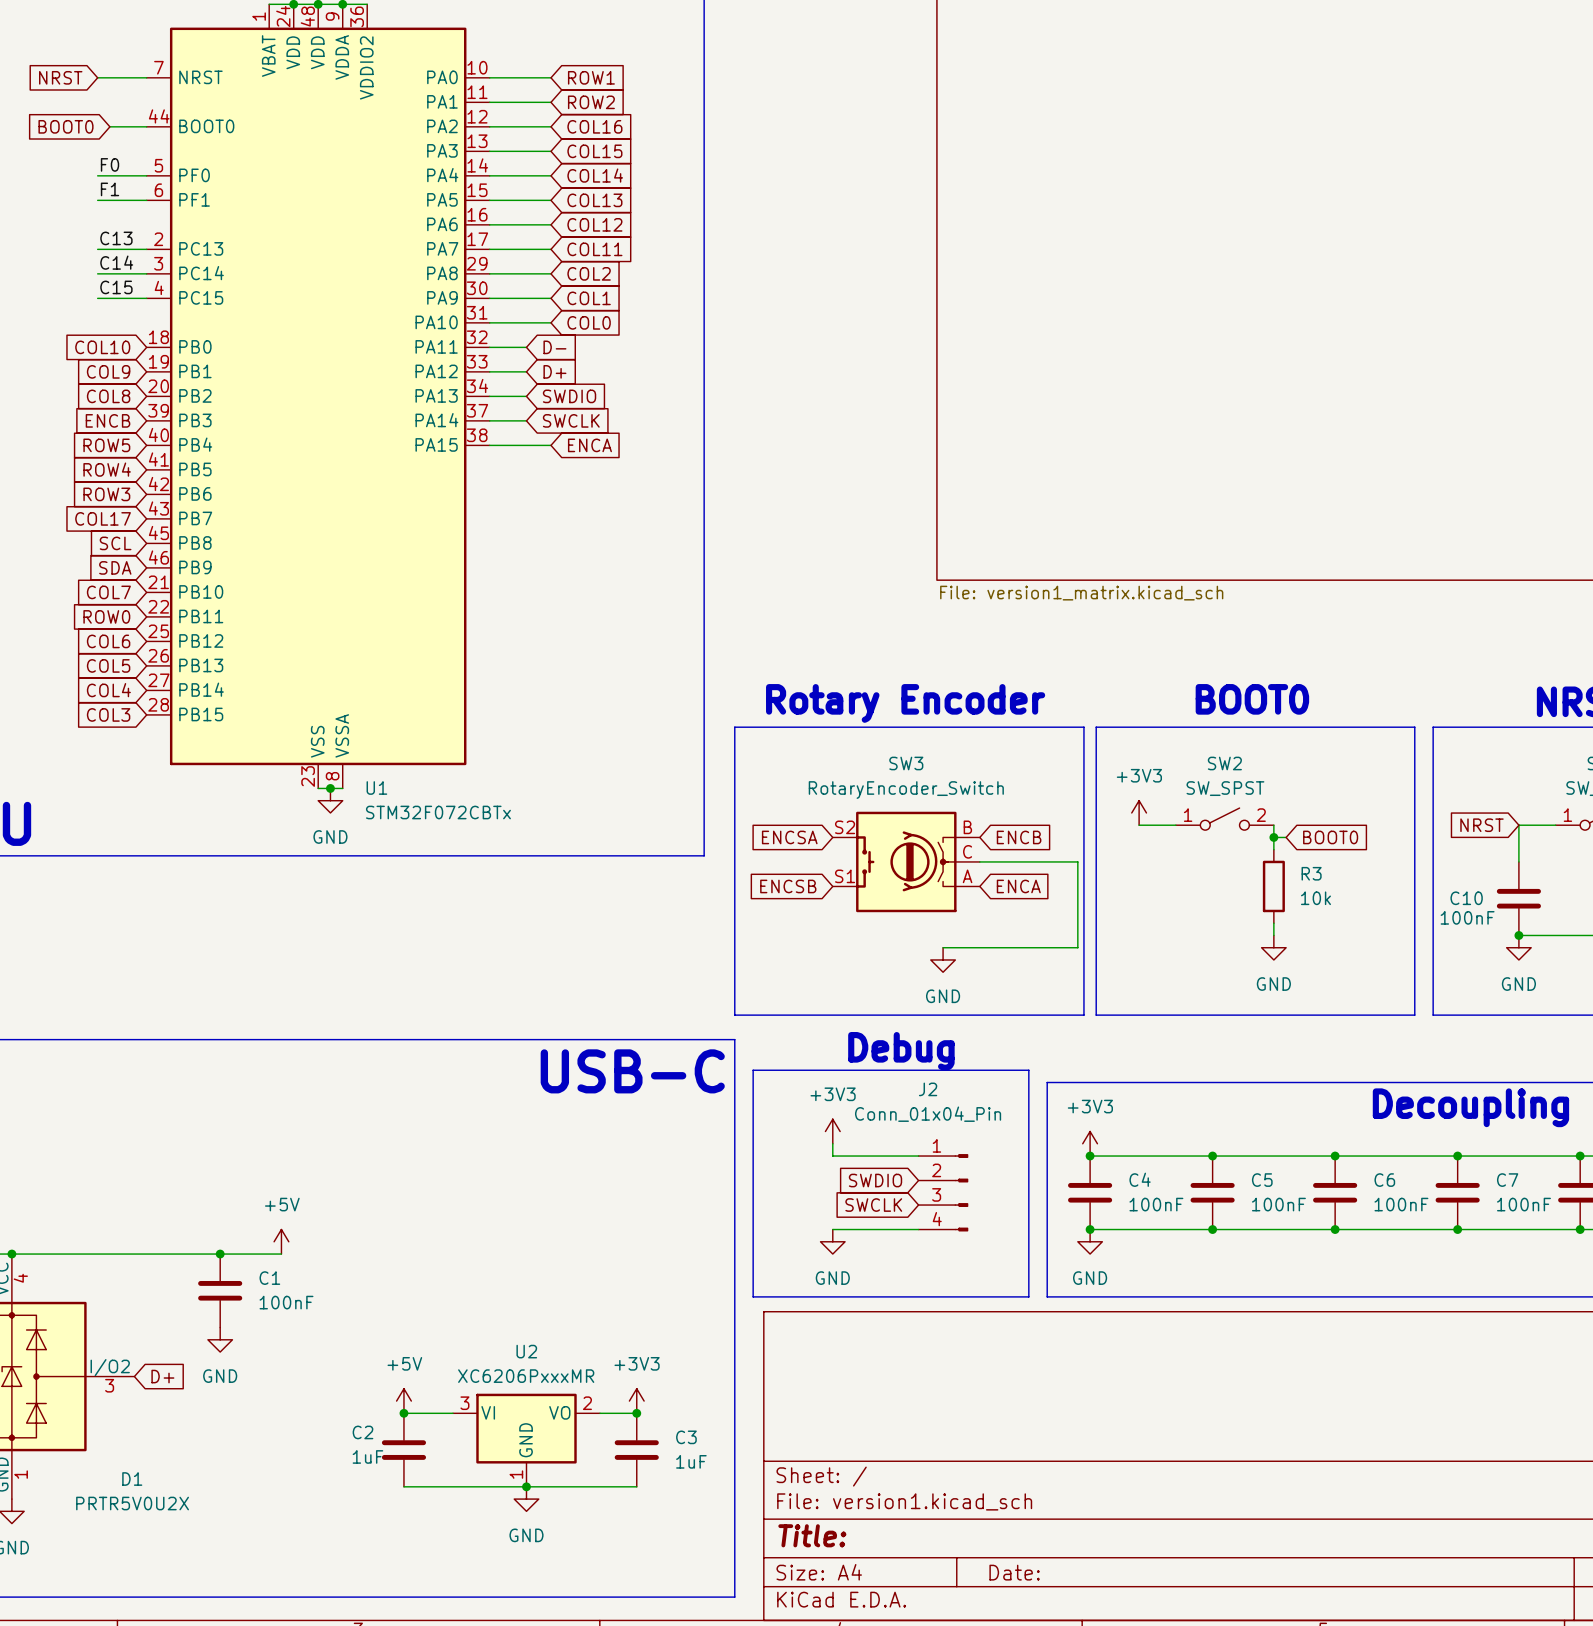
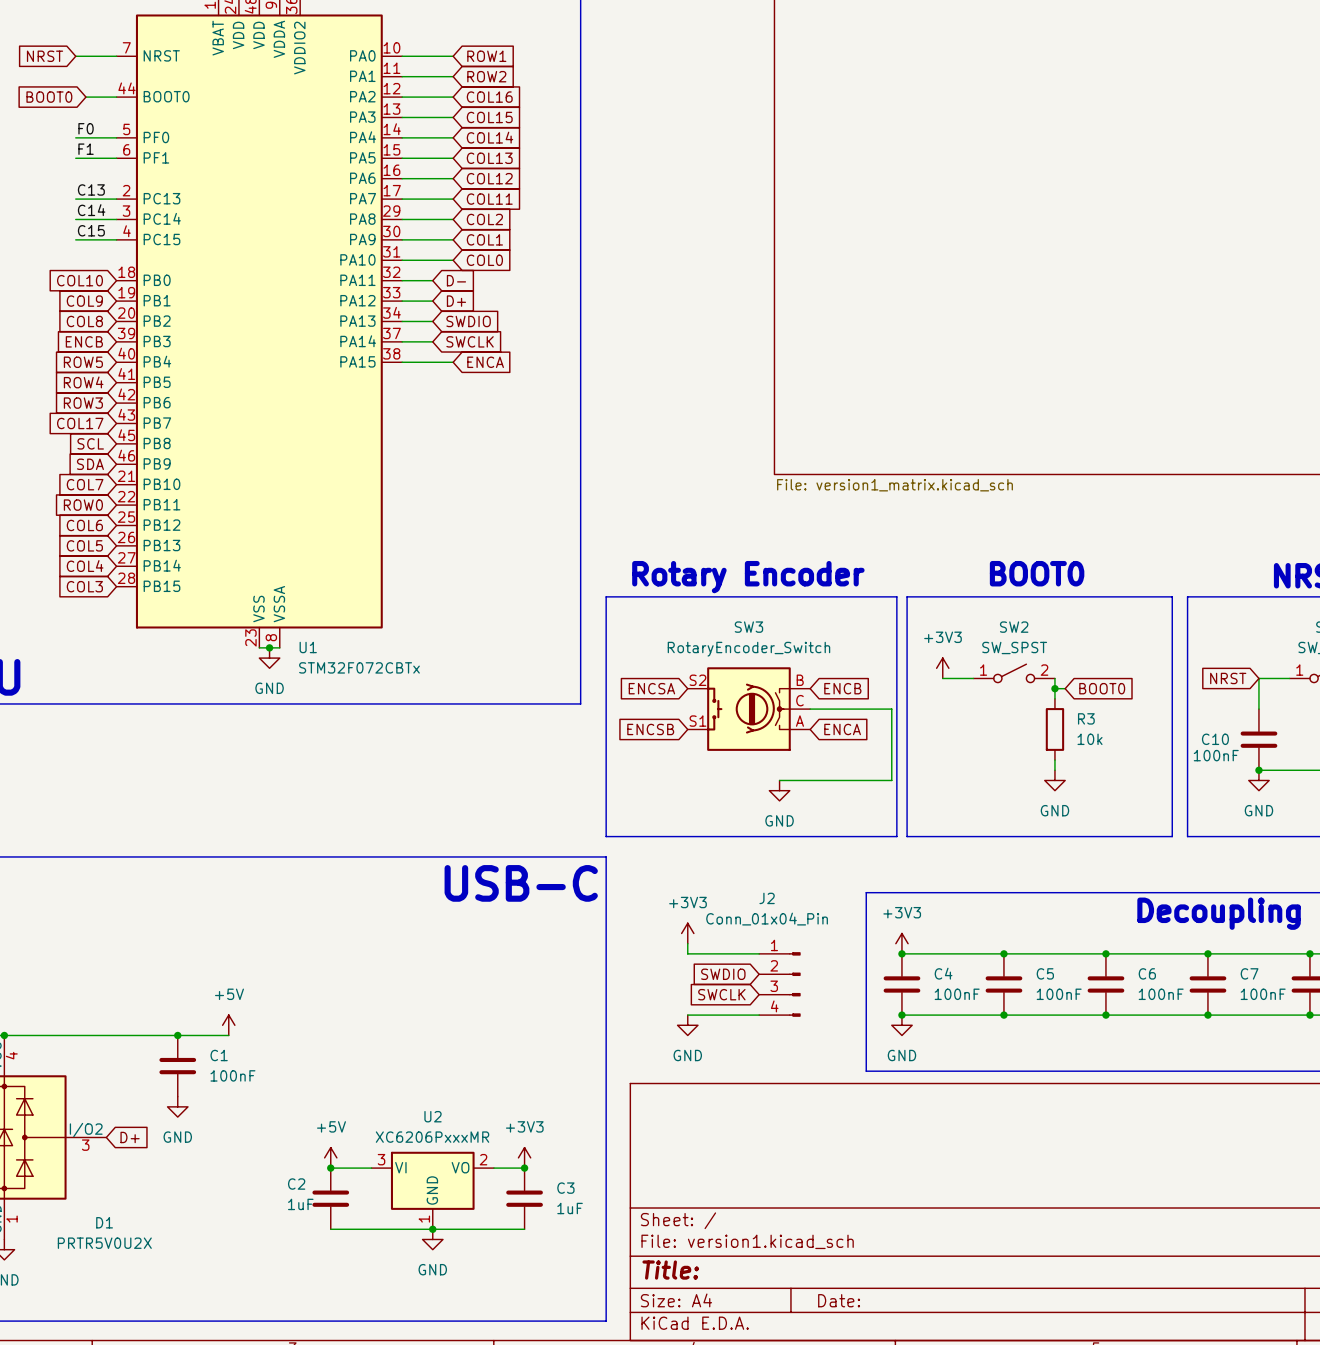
text: Debug (901, 1051) -> none
line: (753, 1070) (1028, 1070) (1028, 1296) (753, 1296) (753, 1070) -> none

